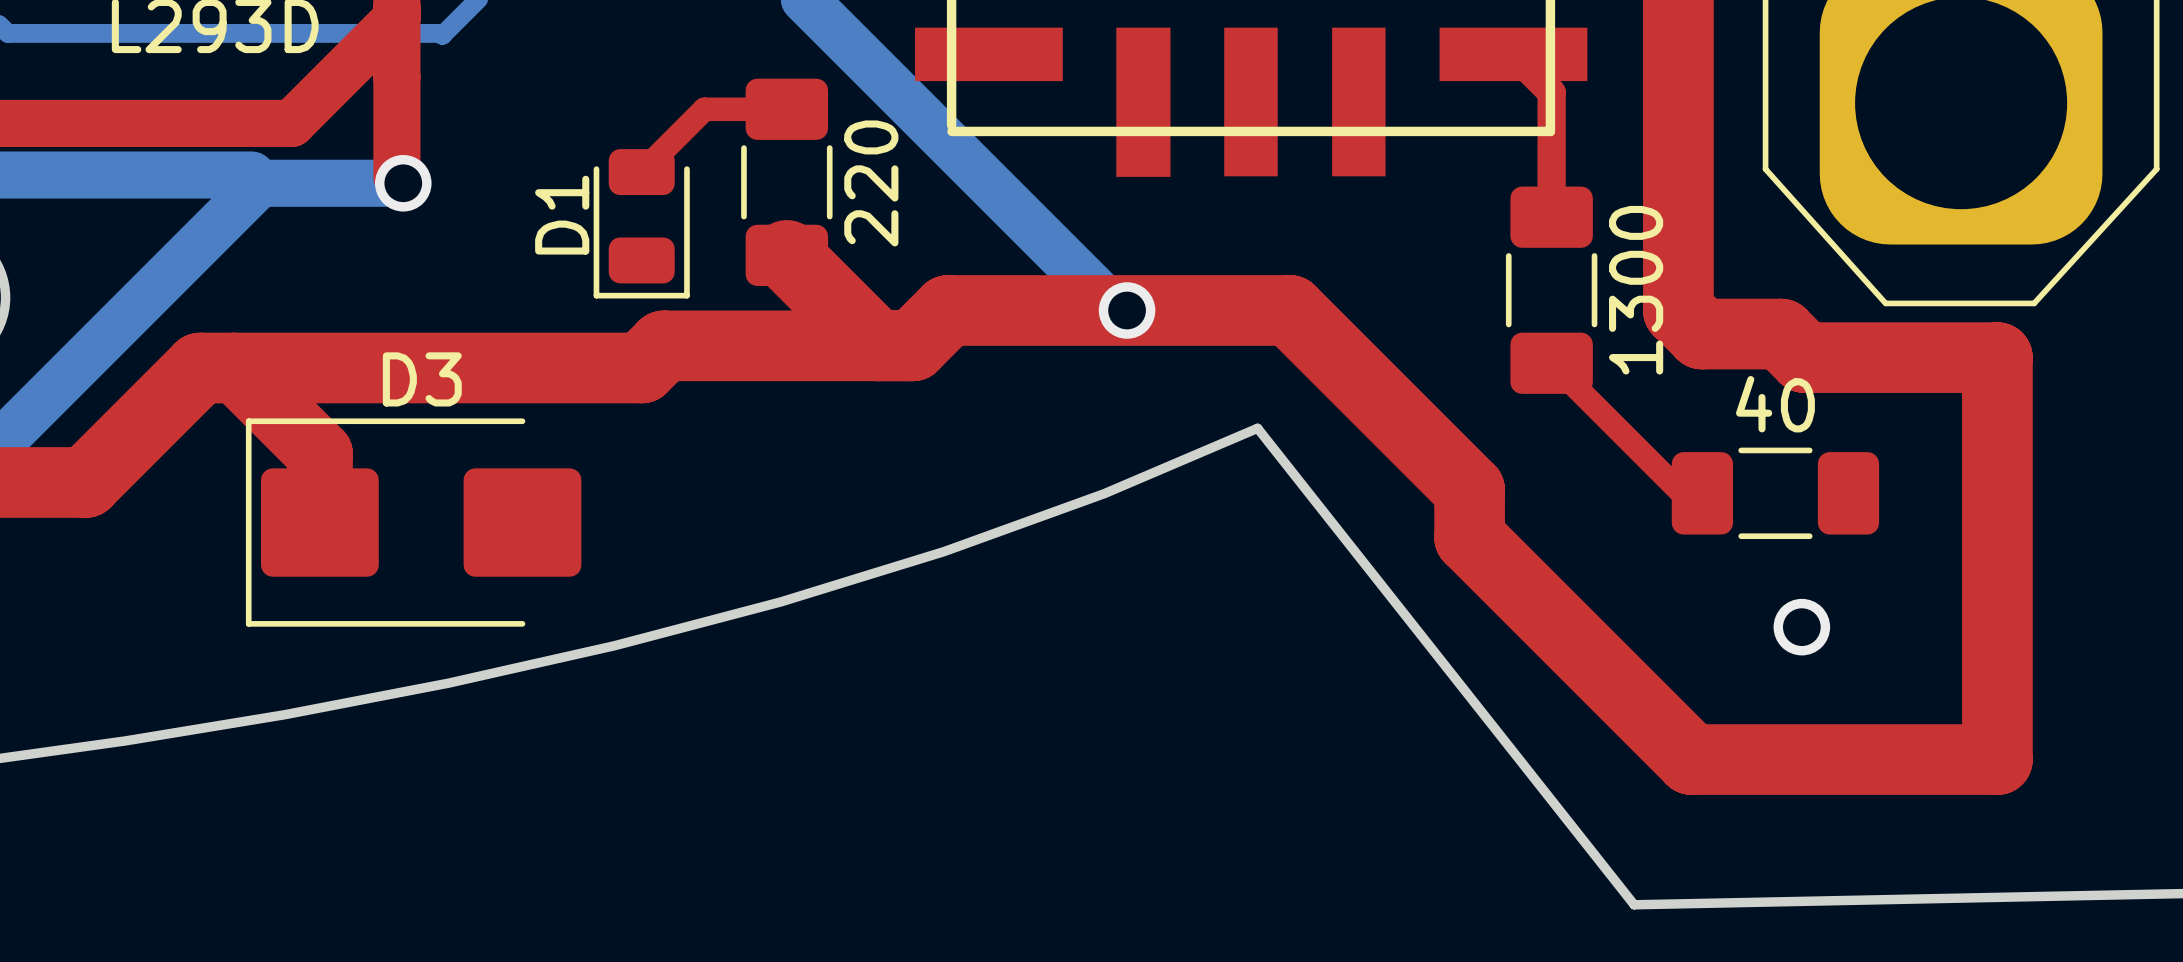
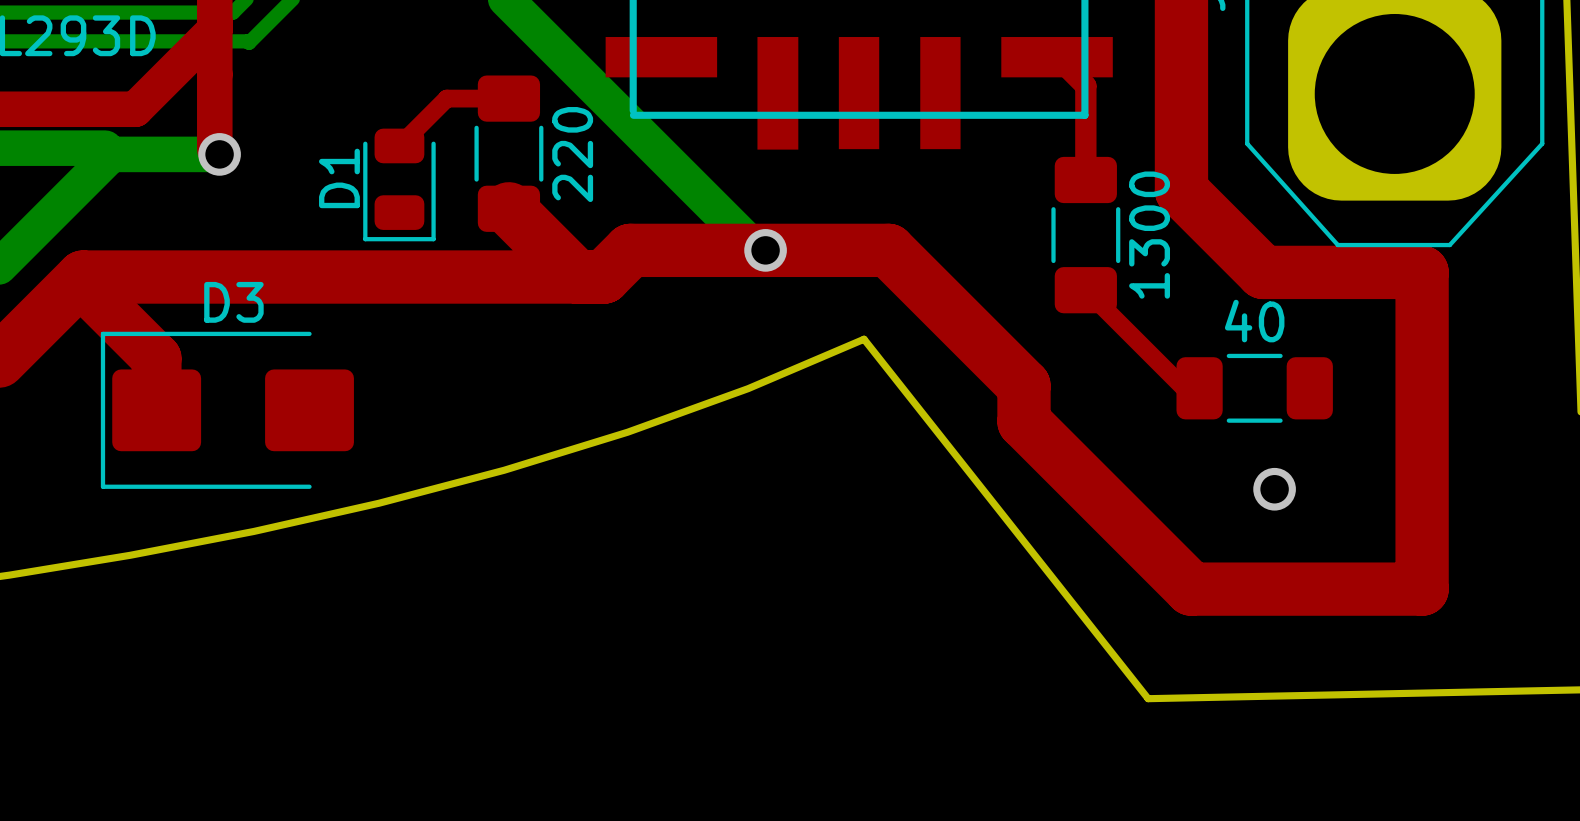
top track: (1678, 231) (1678, 310) (1701, 334) (1781, 334) -> (1181, 190) (1258, 268)
top track: (1786, 339) (1804, 357) (1997, 357) -> (1263, 272) (1422, 272) (1422, 285)
top track: (663, 345) (641, 367) (200, 367) -> (416, 277) (83, 277) (66, 293)

